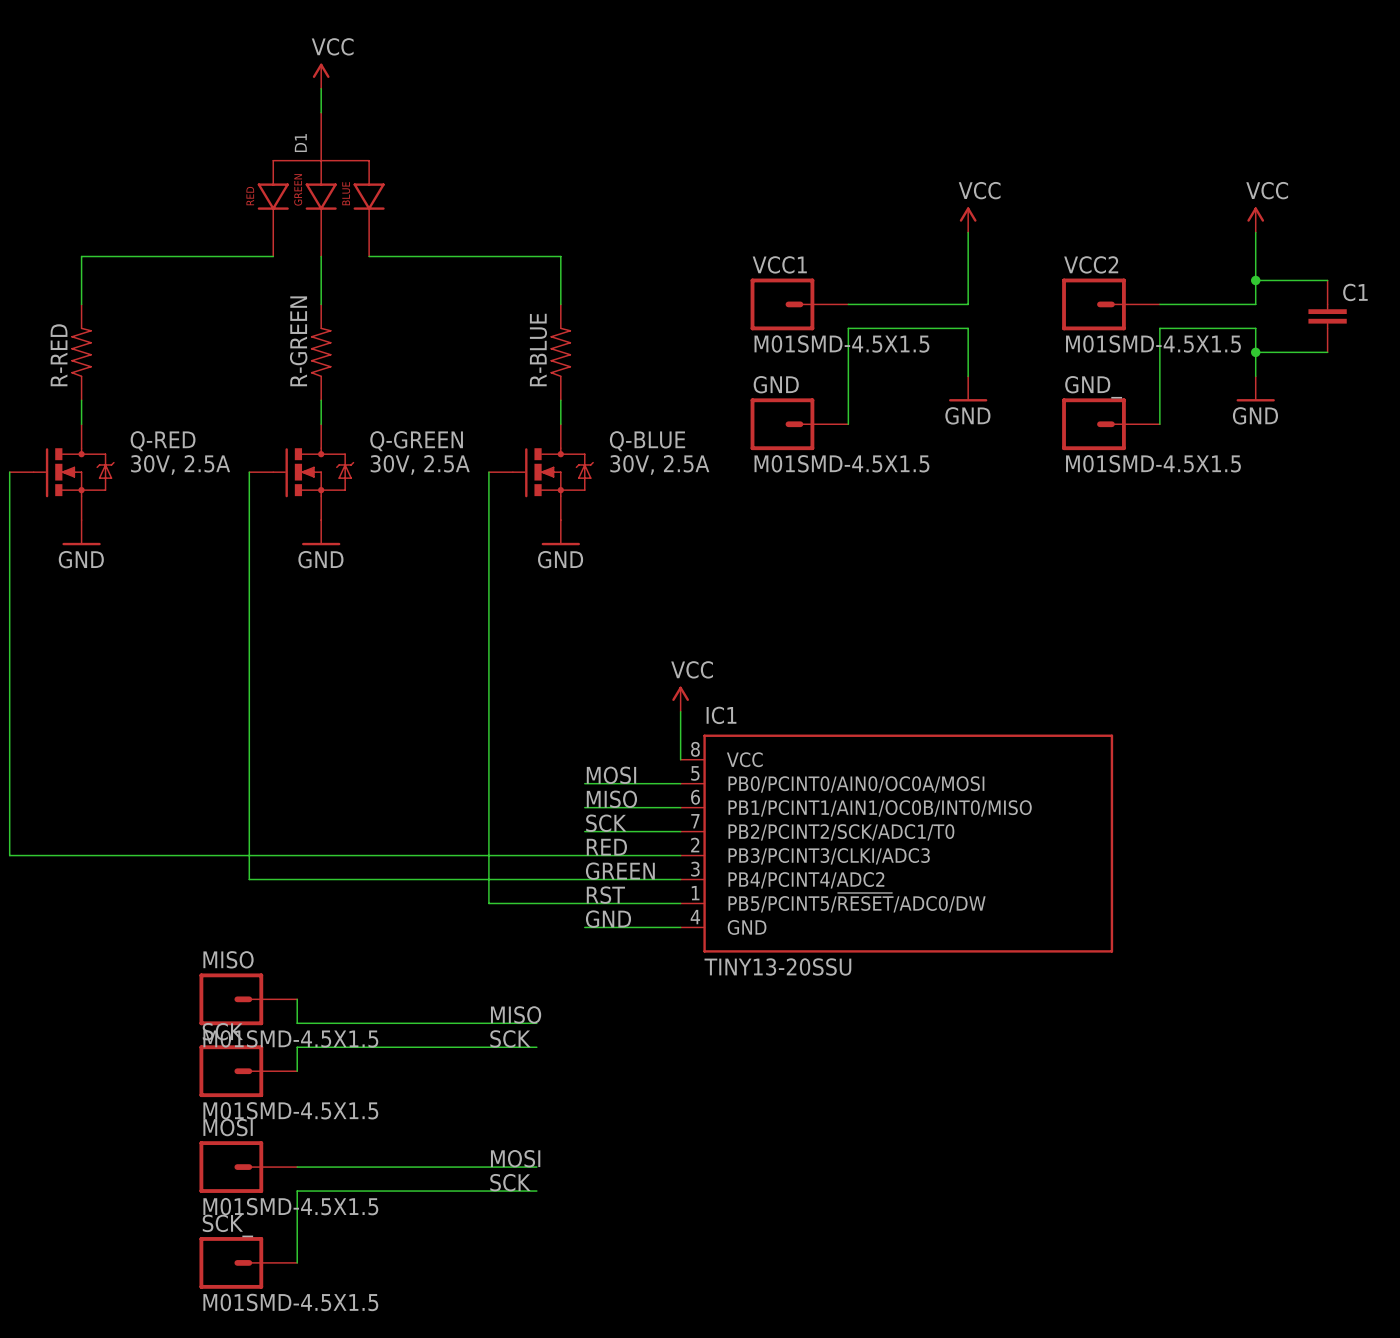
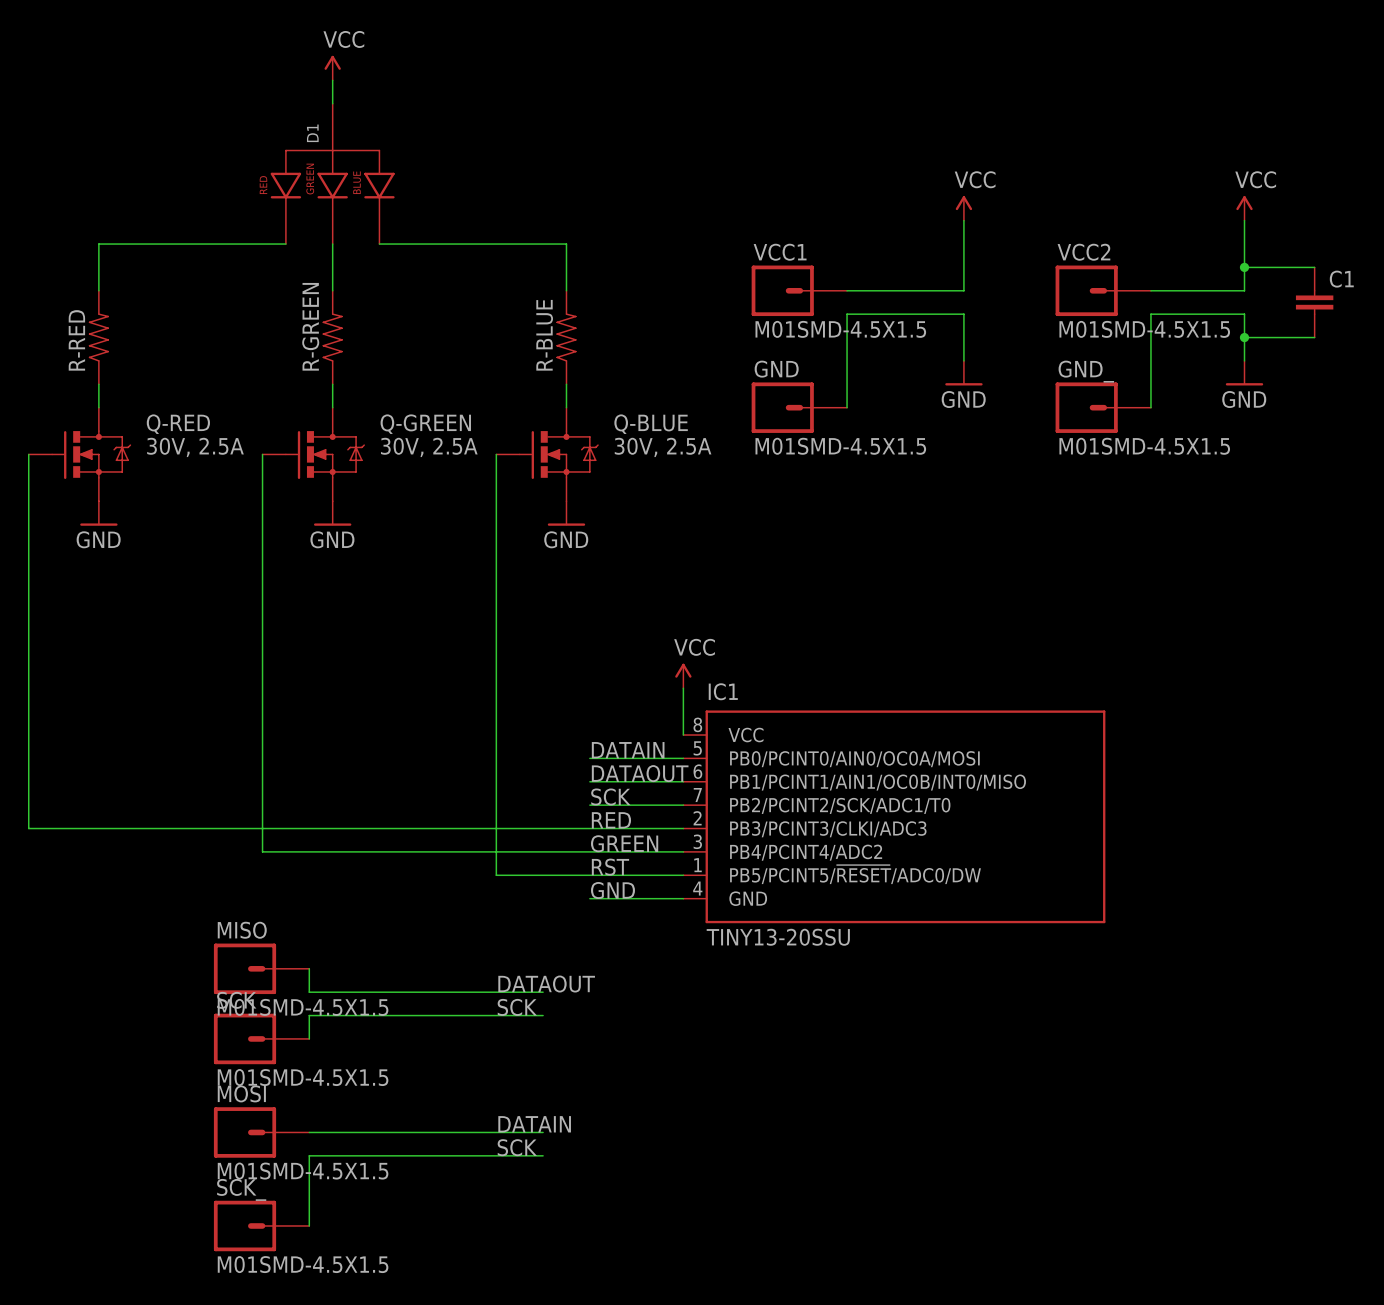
label: MOSI (611, 775) -> DATAIN (628, 750)
label: MISO (611, 799) -> DATAOUT (640, 773)
label: MISO (516, 1014) -> DATAOUT (546, 984)
label: MOSI (515, 1158) -> DATAIN (534, 1124)

